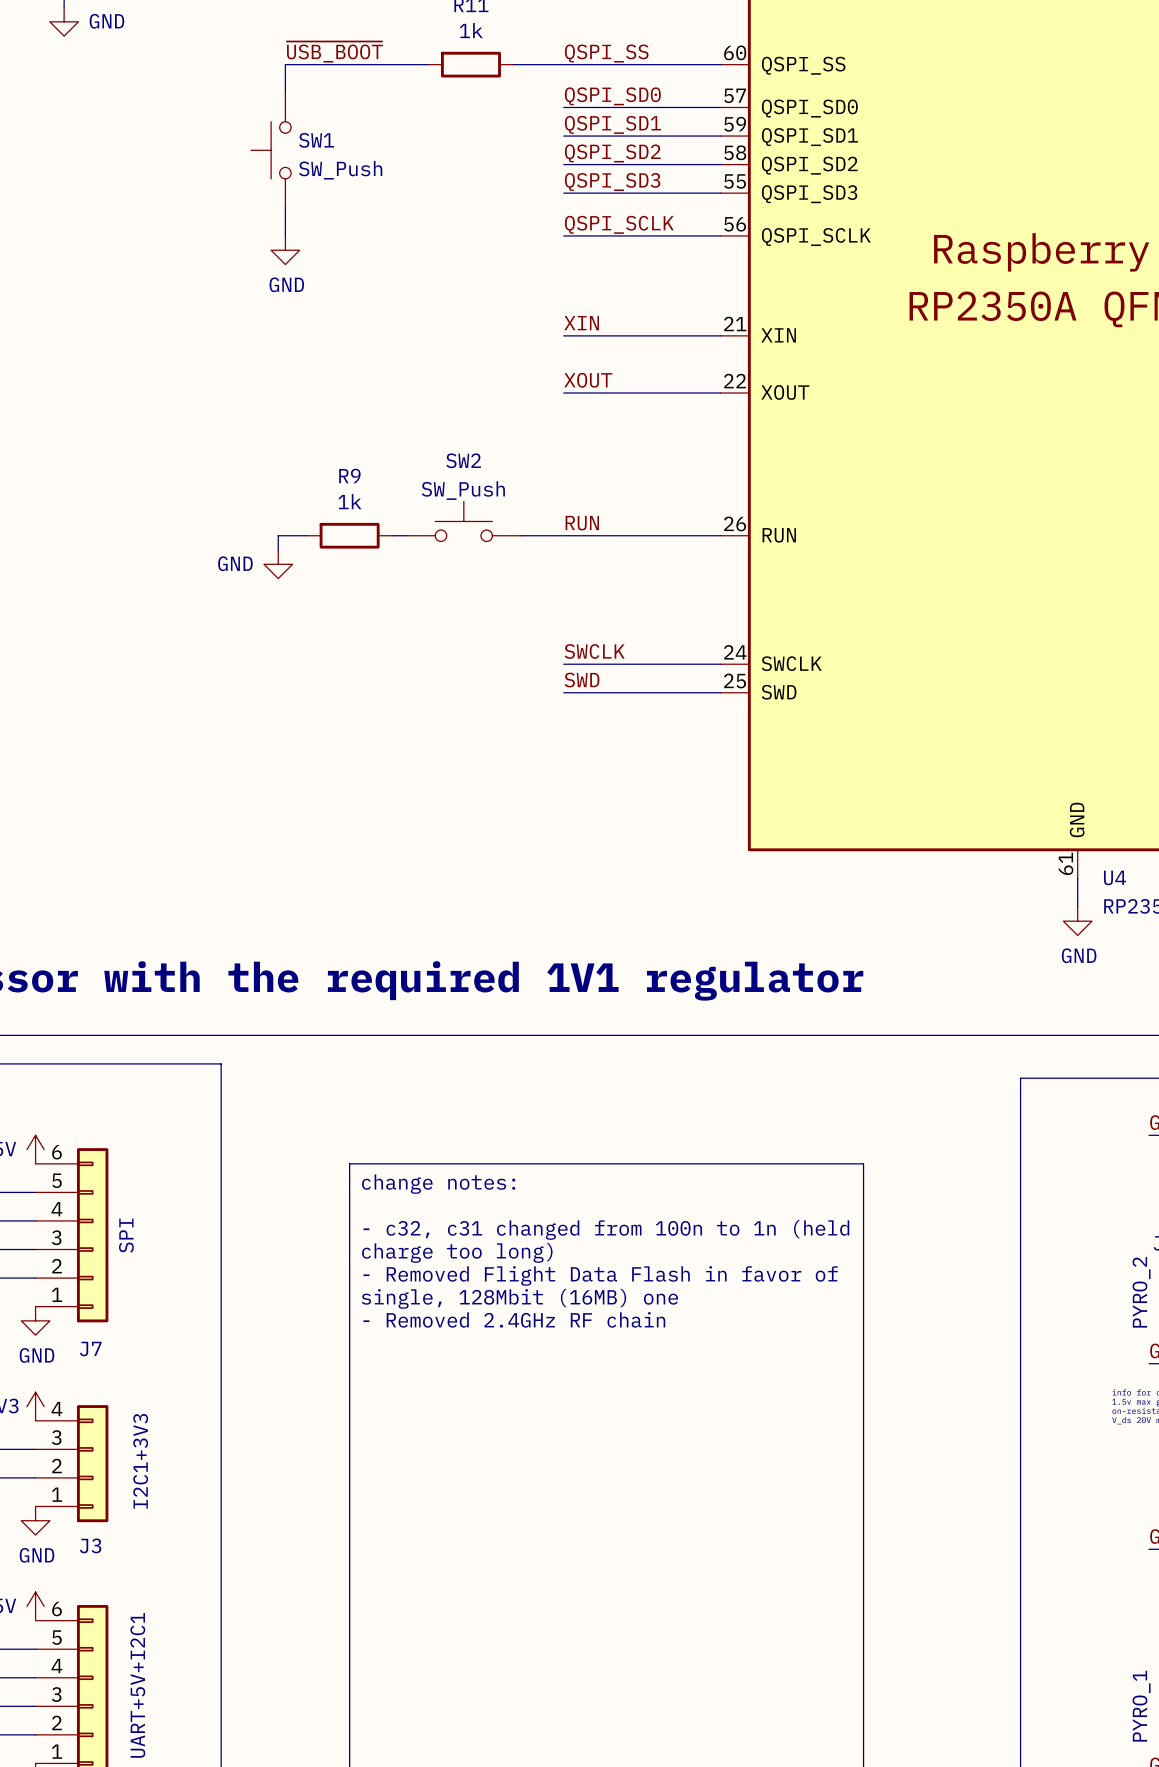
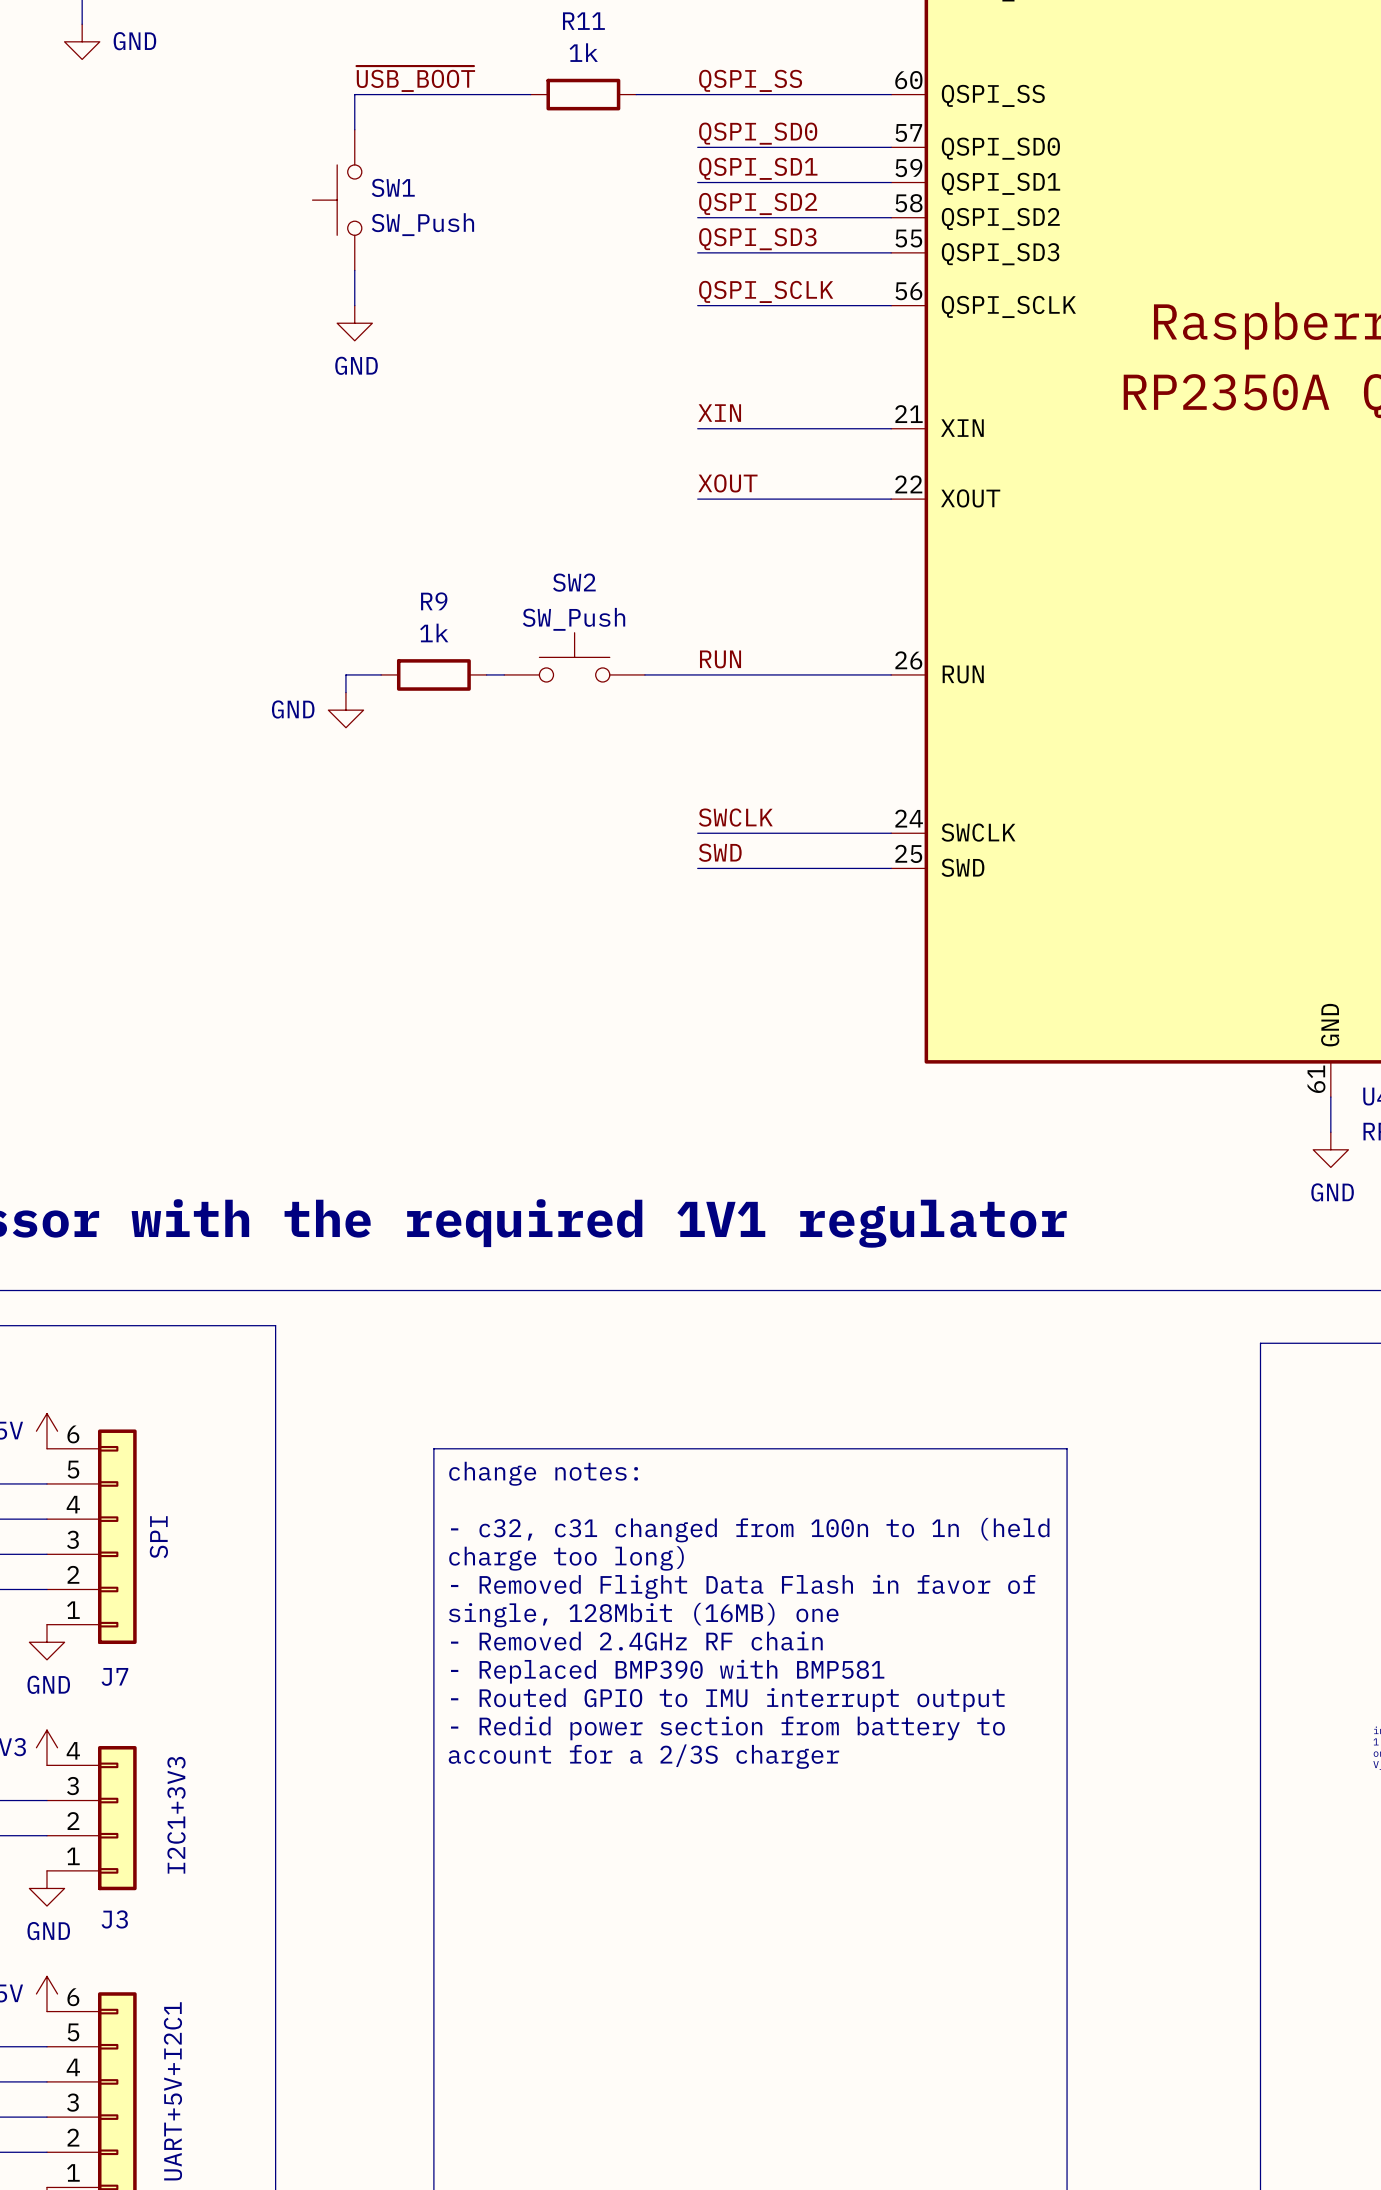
text: none -> - Replaced BMP390 with BMP581 (667, 1671)
text: none -> - Routed GPIO to IMU interrupt output (727, 1700)
text: none -> - Redid power section from battery to (727, 1728)
text: none -> account for a 2/3S charger (643, 1756)

